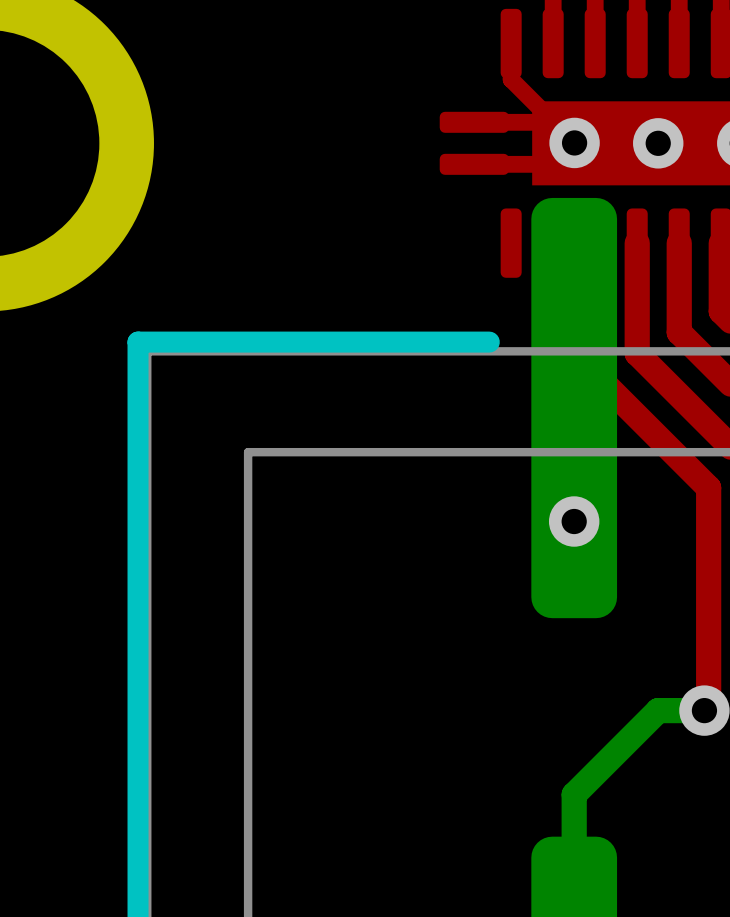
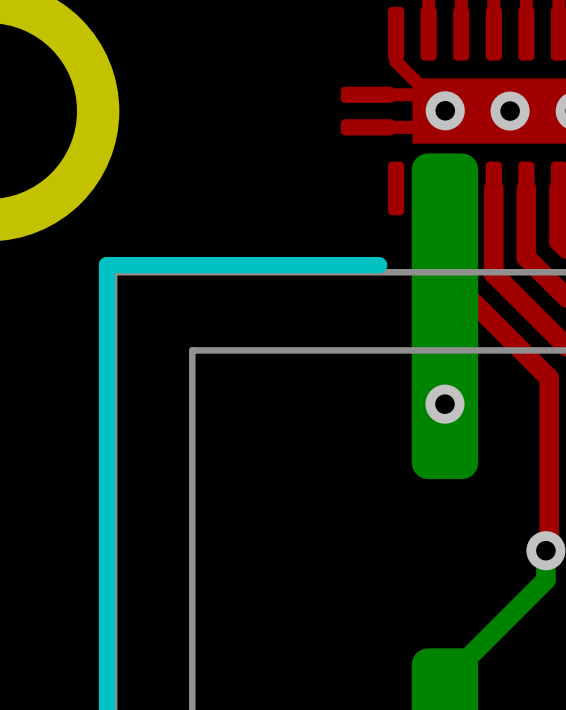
bottom track: (704, 710) (658, 710) (574, 794) (574, 878) -> (545, 550) (545, 579) (444, 680)

